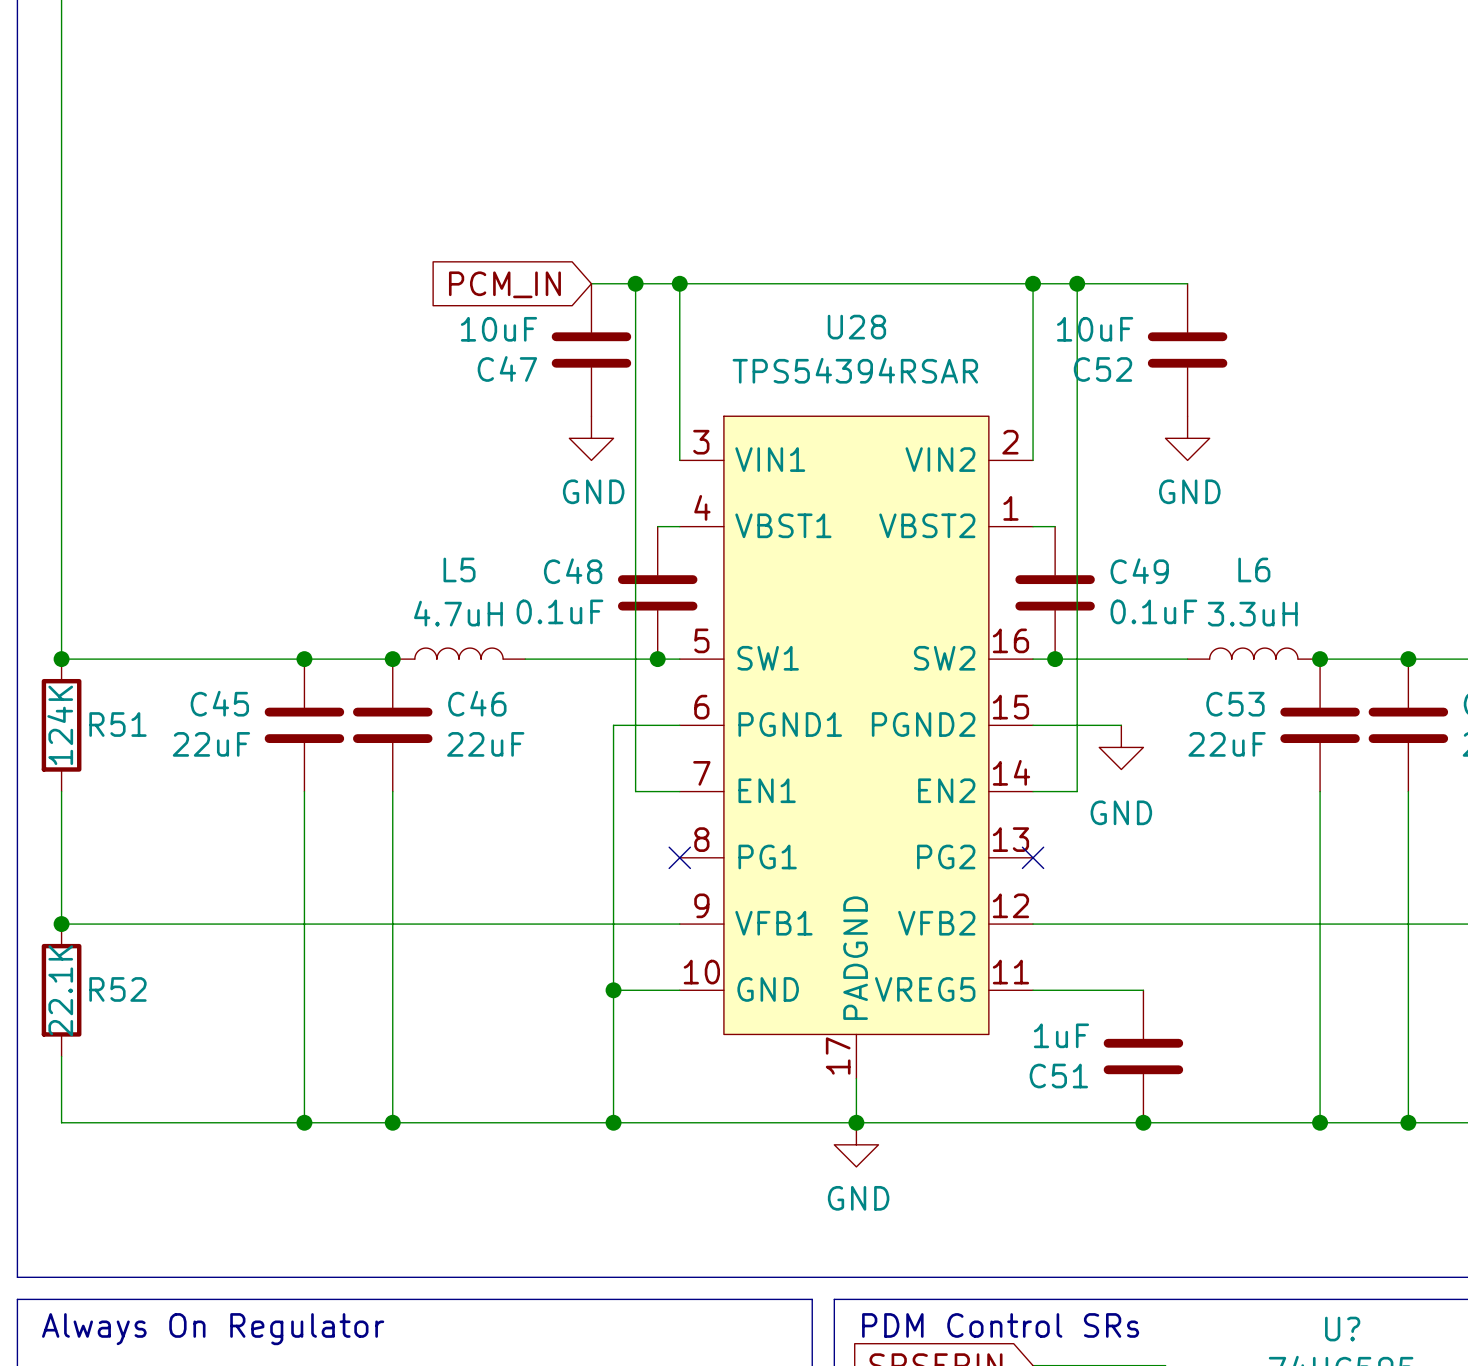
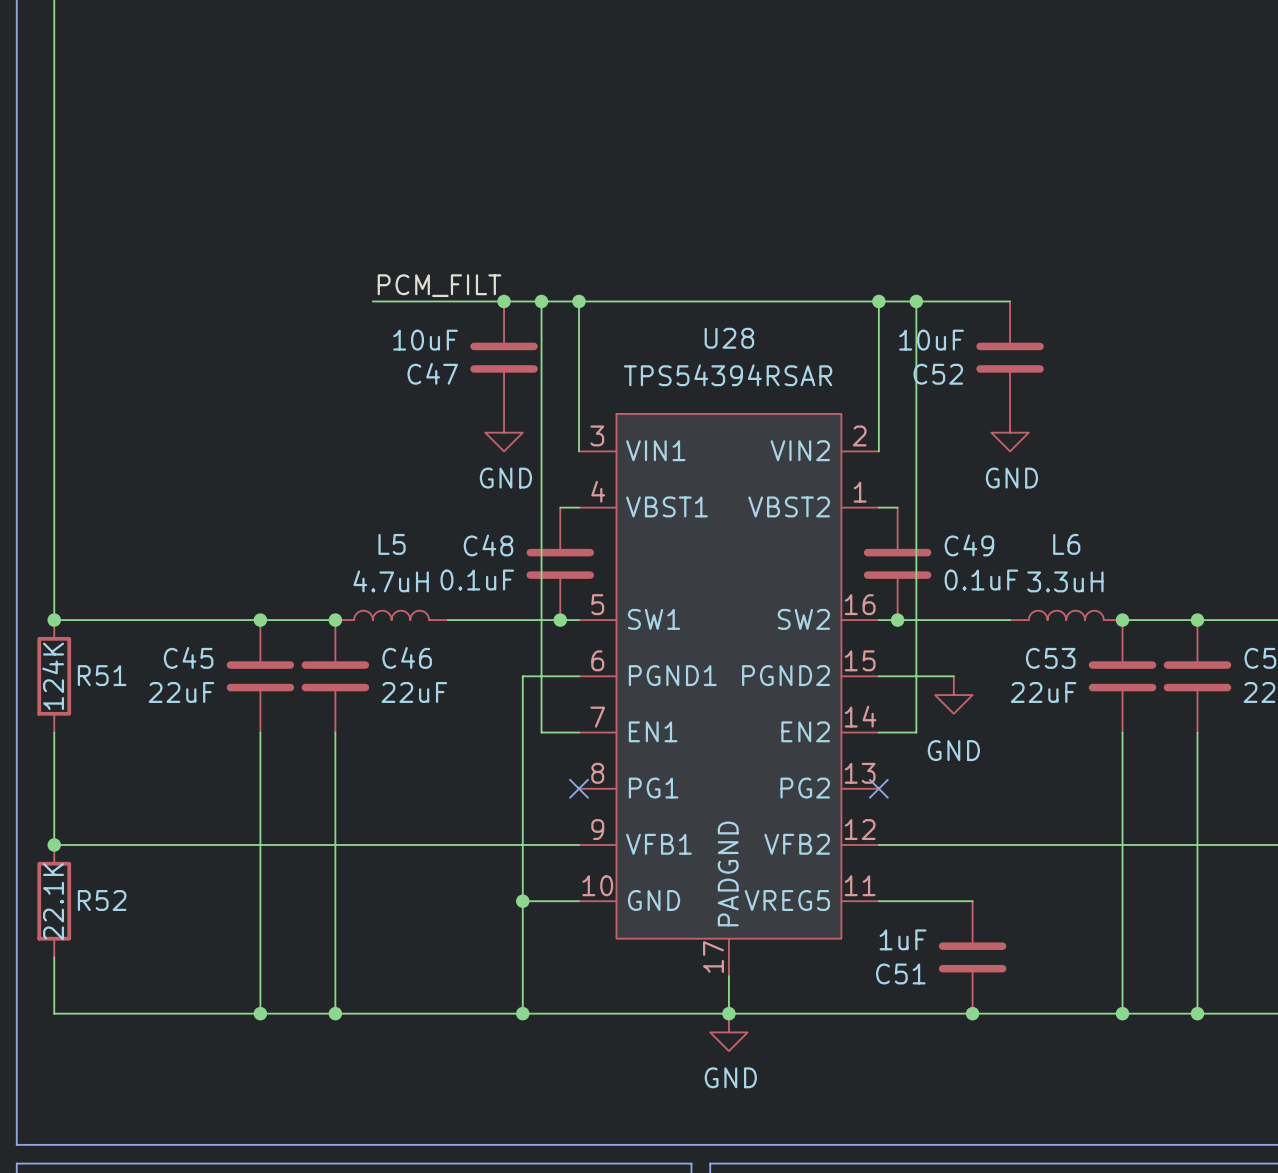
label: none -> PCM_FILT (439, 285)
wire: none -> (372, 301) (504, 301)
junction: none -> (504, 301)
global label: PCM_IN (504, 284) -> none

